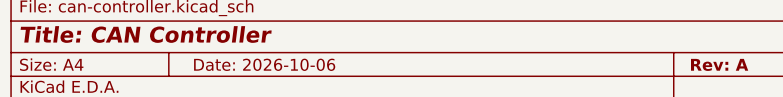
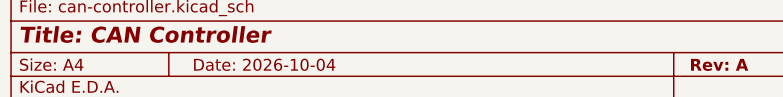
title block: Date: 2026-10-06 (264, 64) -> Date: 2026-10-04 (264, 64)

